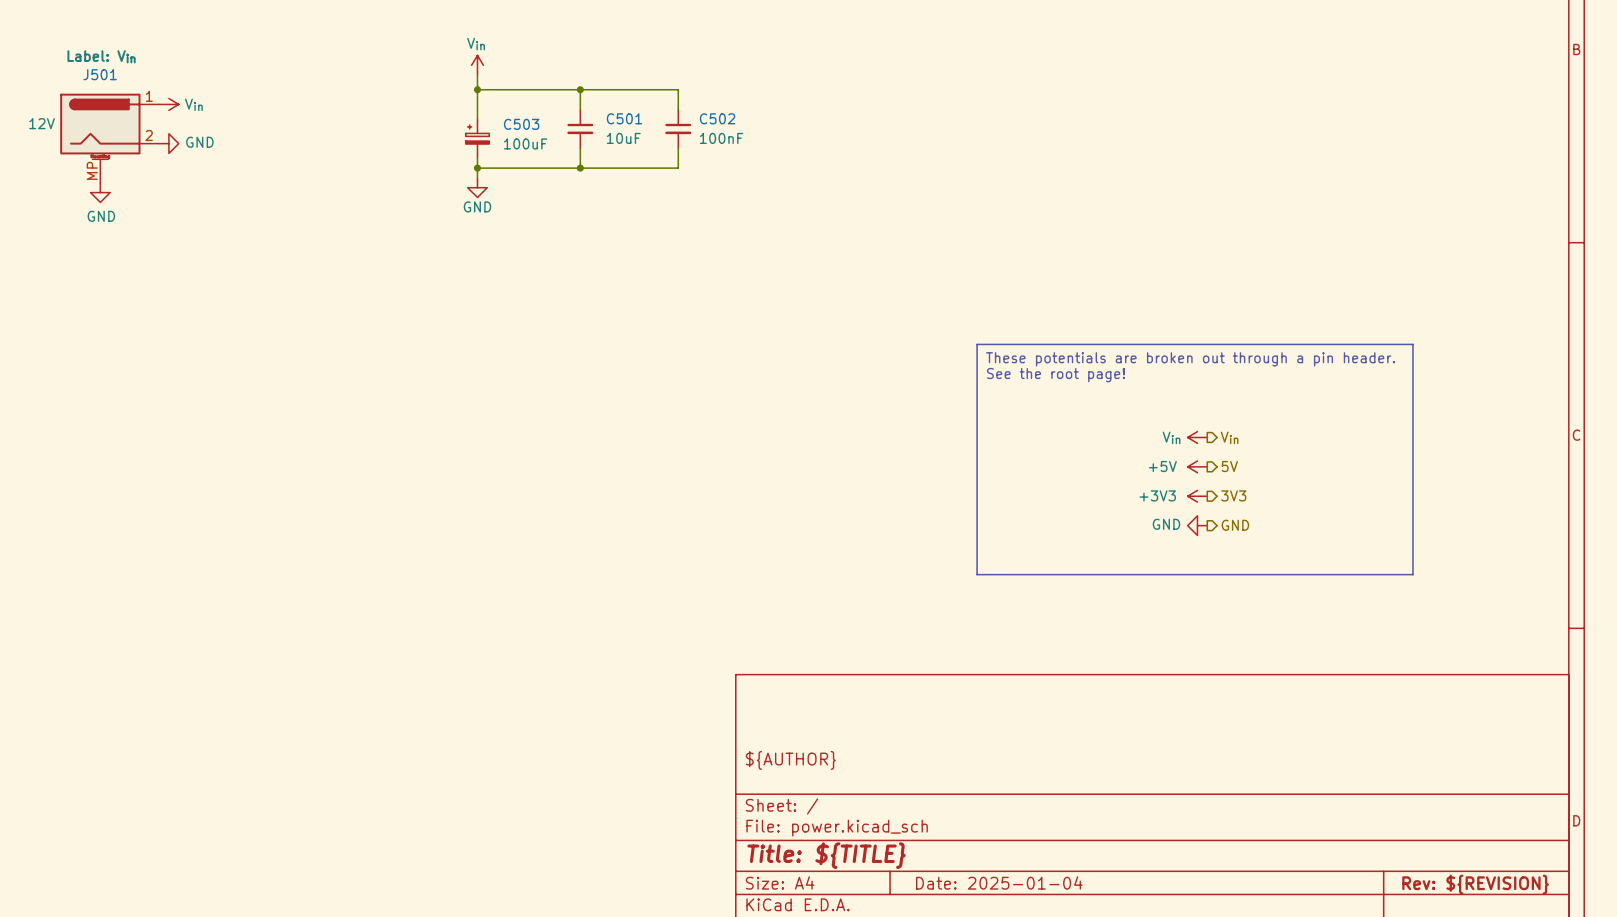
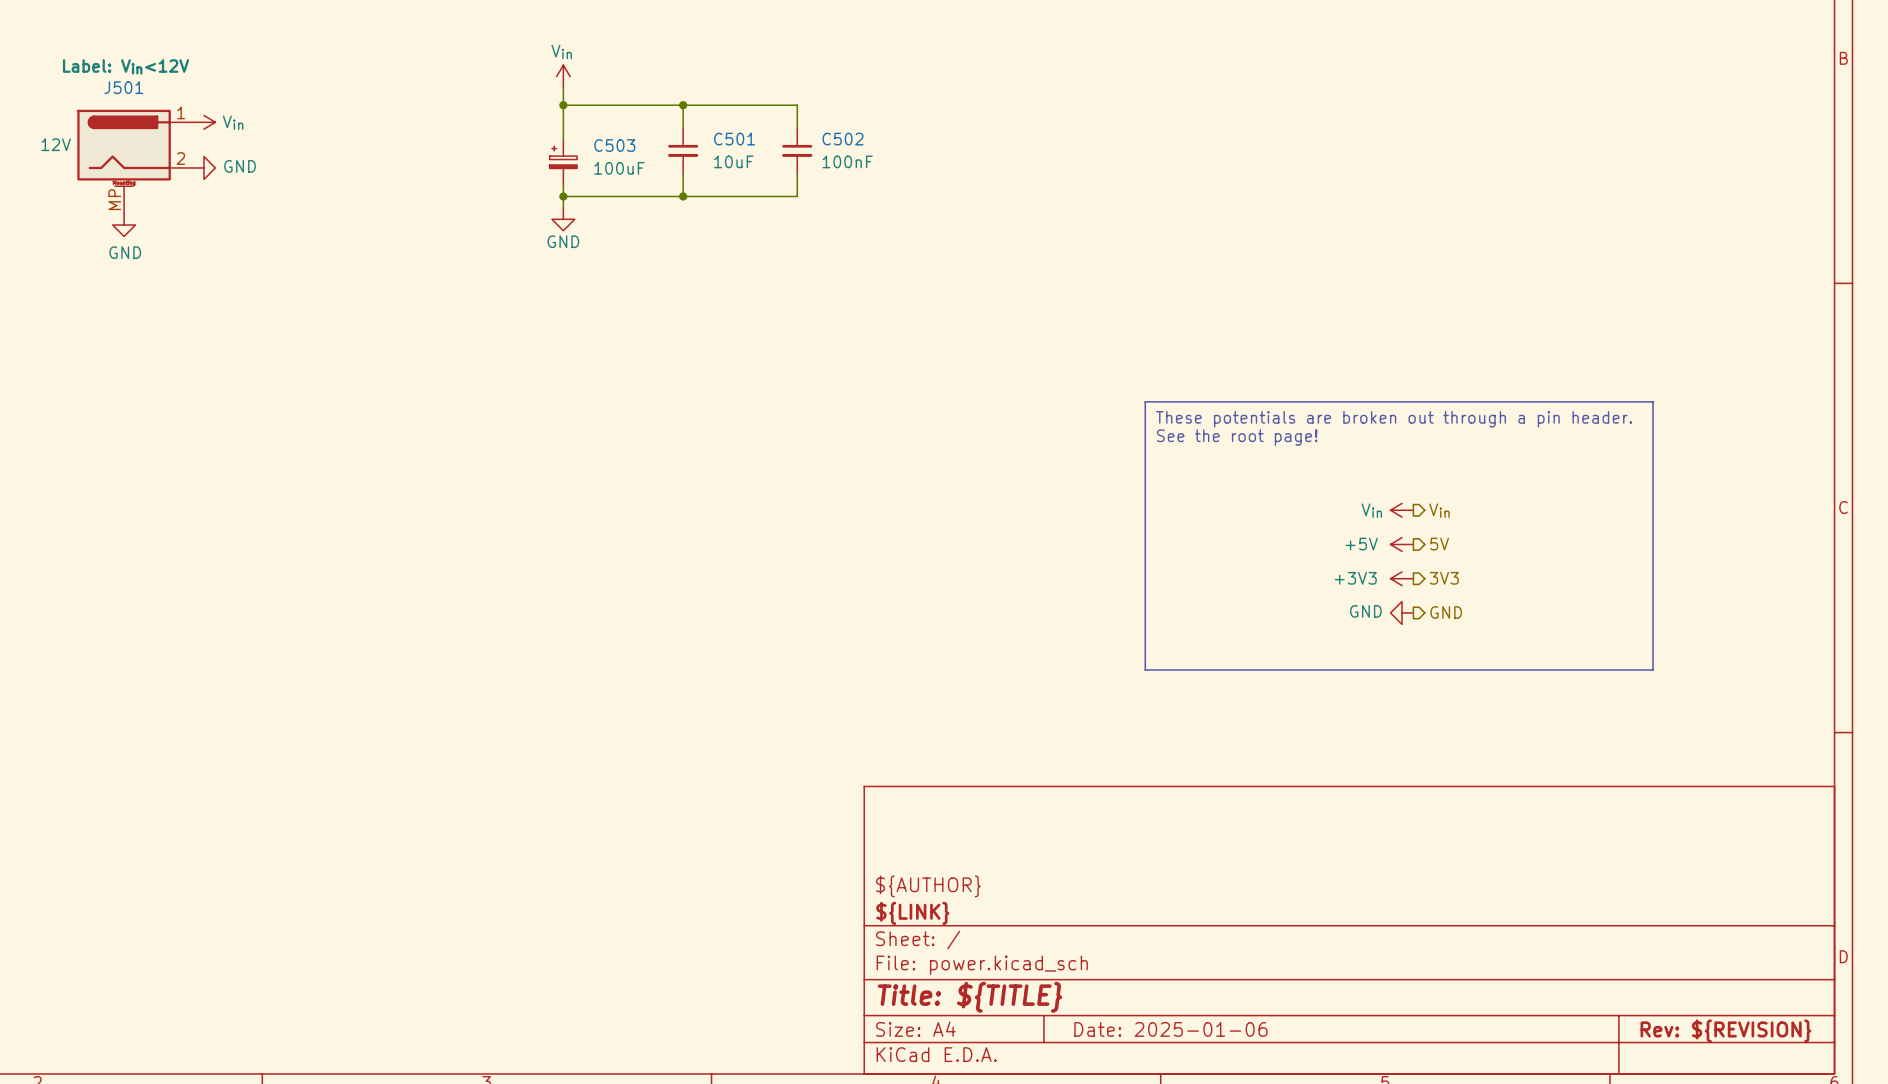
J501 text: Label: Vin (101, 56) -> Label: Vin<12V (126, 66)
title block: none -> ${LINK} (912, 913)
title block: Date: 2025-01-04 (999, 882) -> Date: 2025-01-06 (1170, 1029)

